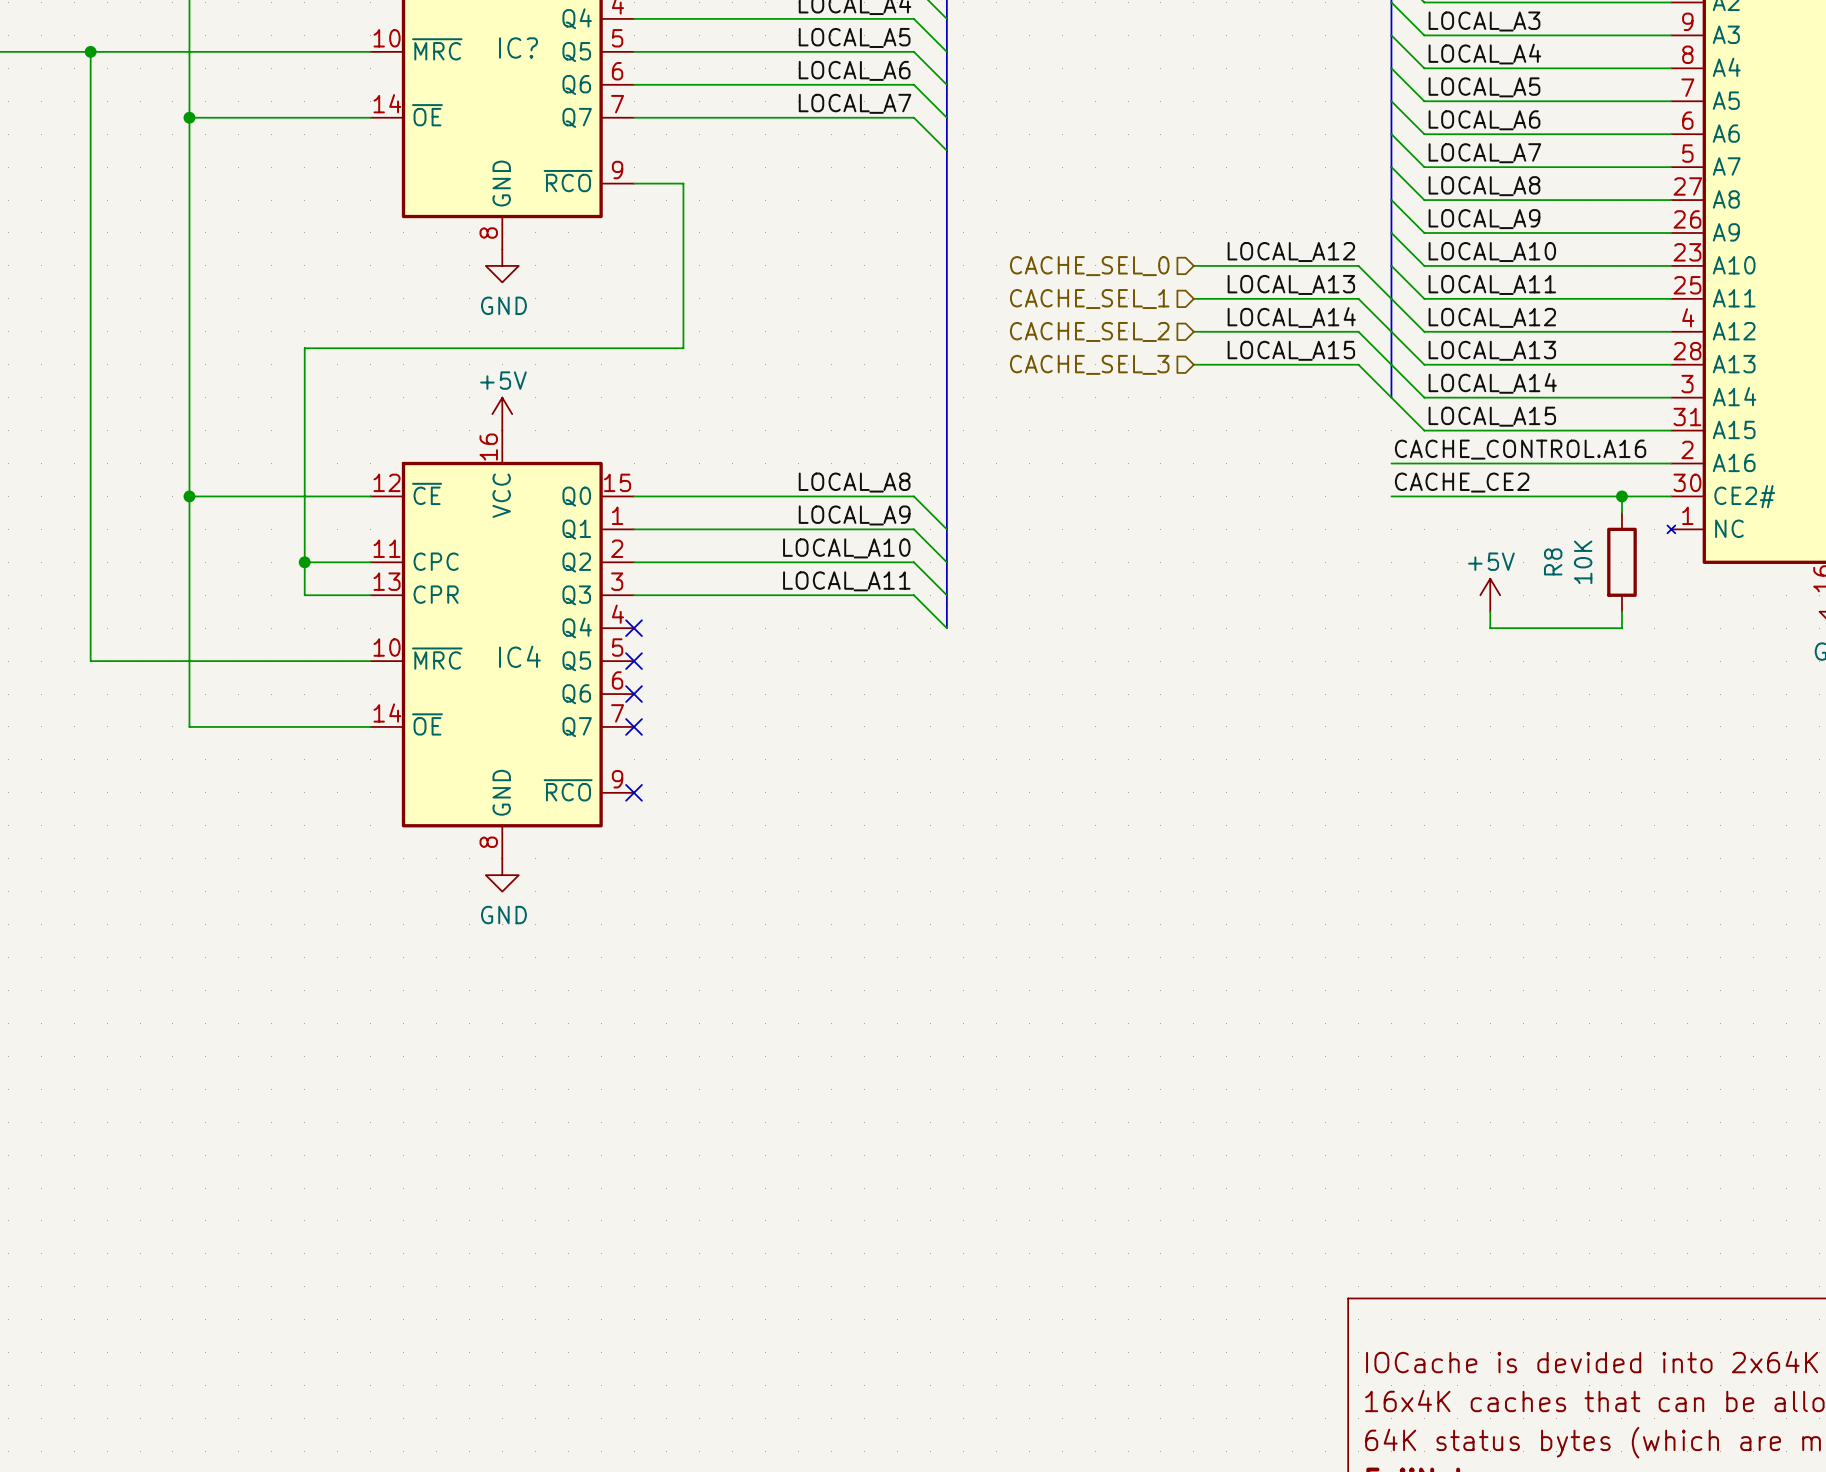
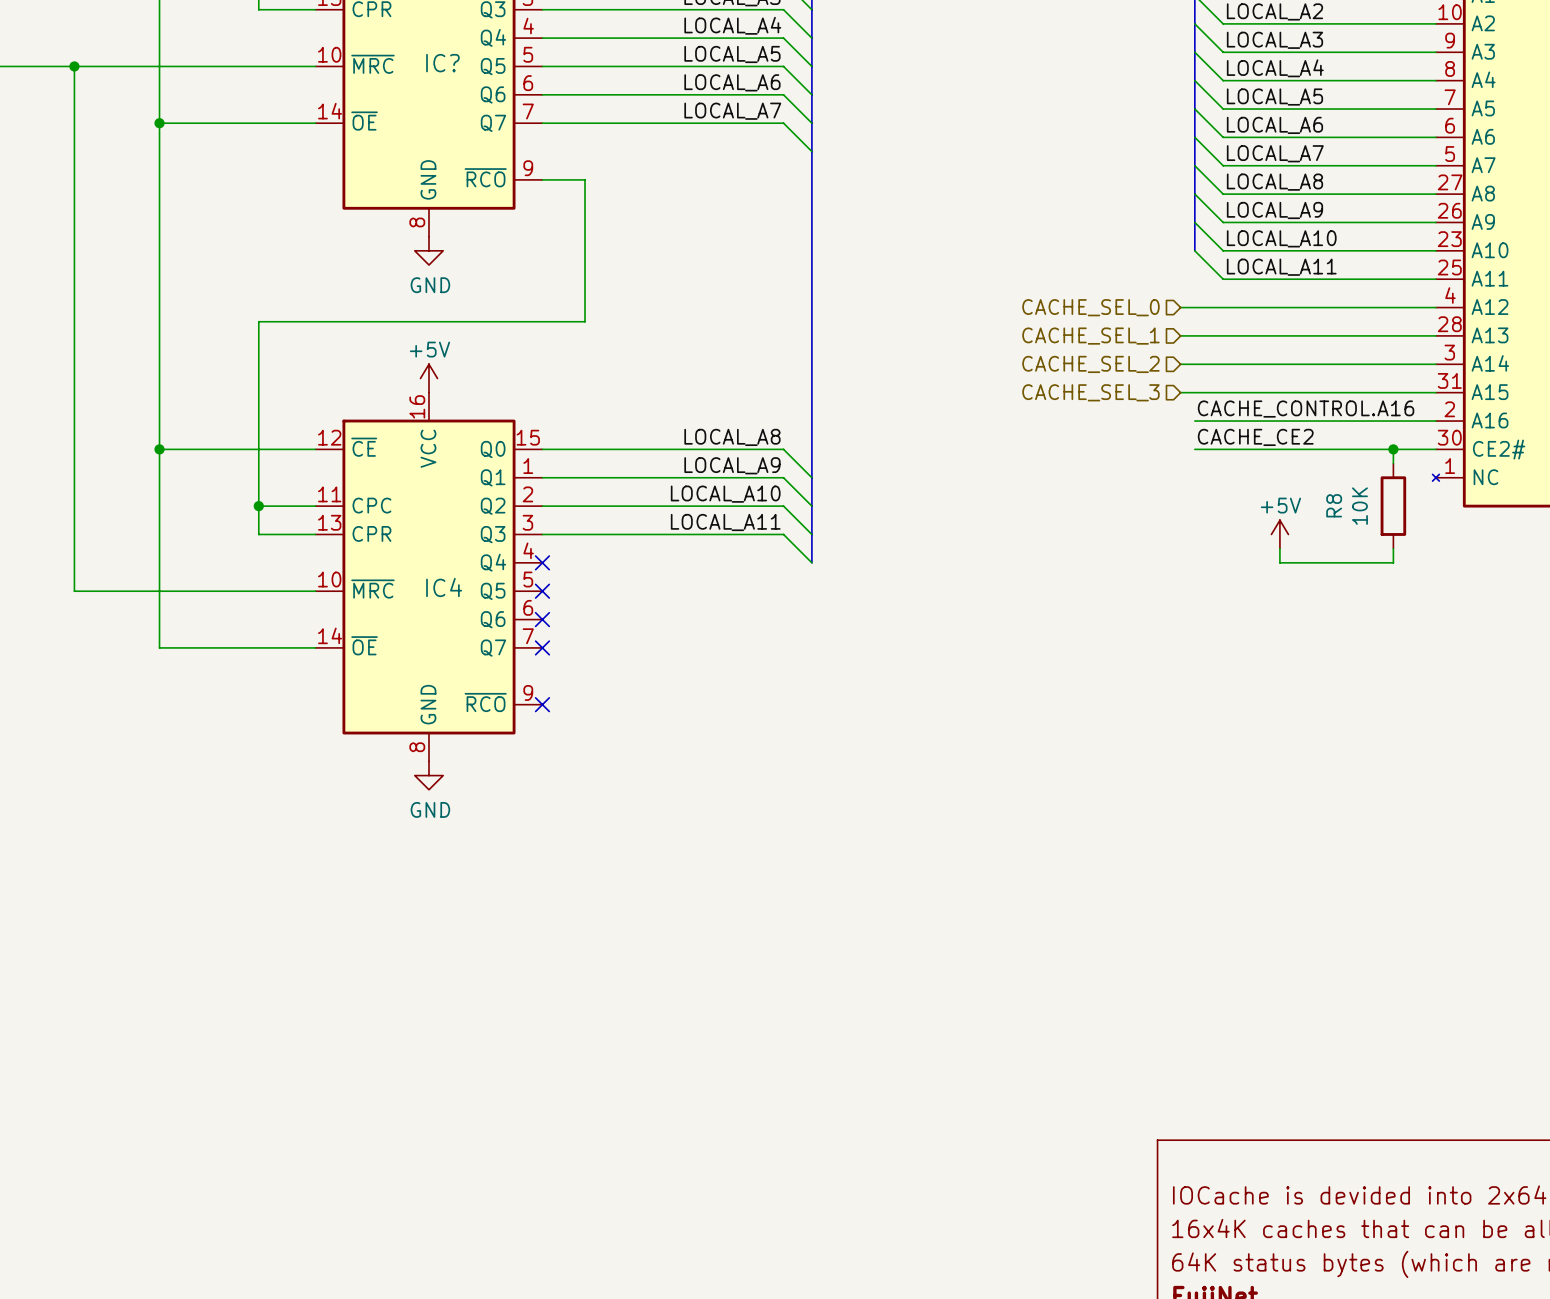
label: LOCAL_A12 (1291, 252) -> none
wire: (1193, 265) (1358, 265) (1424, 331) -> (1180, 307) (1223, 307)
bus: (1391, 265) (1391, 397) -> none
hierarchical label position: CACHE_SEL_0 (1089, 266) -> CACHE_SEL_0 (1090, 307)
label: LOCAL_A13 (1291, 284) -> none
wire: (1193, 298) (1358, 298) (1424, 364) -> (1180, 335) (1223, 335)
hierarchical label position: CACHE_SEL_1 (1089, 299) -> CACHE_SEL_1 (1090, 336)
label: LOCAL_A14 (1291, 317) -> none
label: LOCAL_A12 (1492, 317) -> none
hierarchical label position: CACHE_SEL_2 (1089, 331) -> CACHE_SEL_2 (1090, 364)
wire: (1193, 331) (1358, 331) (1424, 397) -> (1180, 364) (1223, 364)
label: LOCAL_A15 (1291, 350) -> none
label: LOCAL_A13 (1492, 350) -> none
hierarchical label position: CACHE_SEL_3 (1089, 364) -> CACHE_SEL_3 (1090, 392)
wire: (1193, 364) (1358, 364) (1424, 430) -> (1180, 392) (1223, 392)
label: LOCAL_A14 (1492, 383) -> none
label: LOCAL_A15 (1492, 416) -> none

